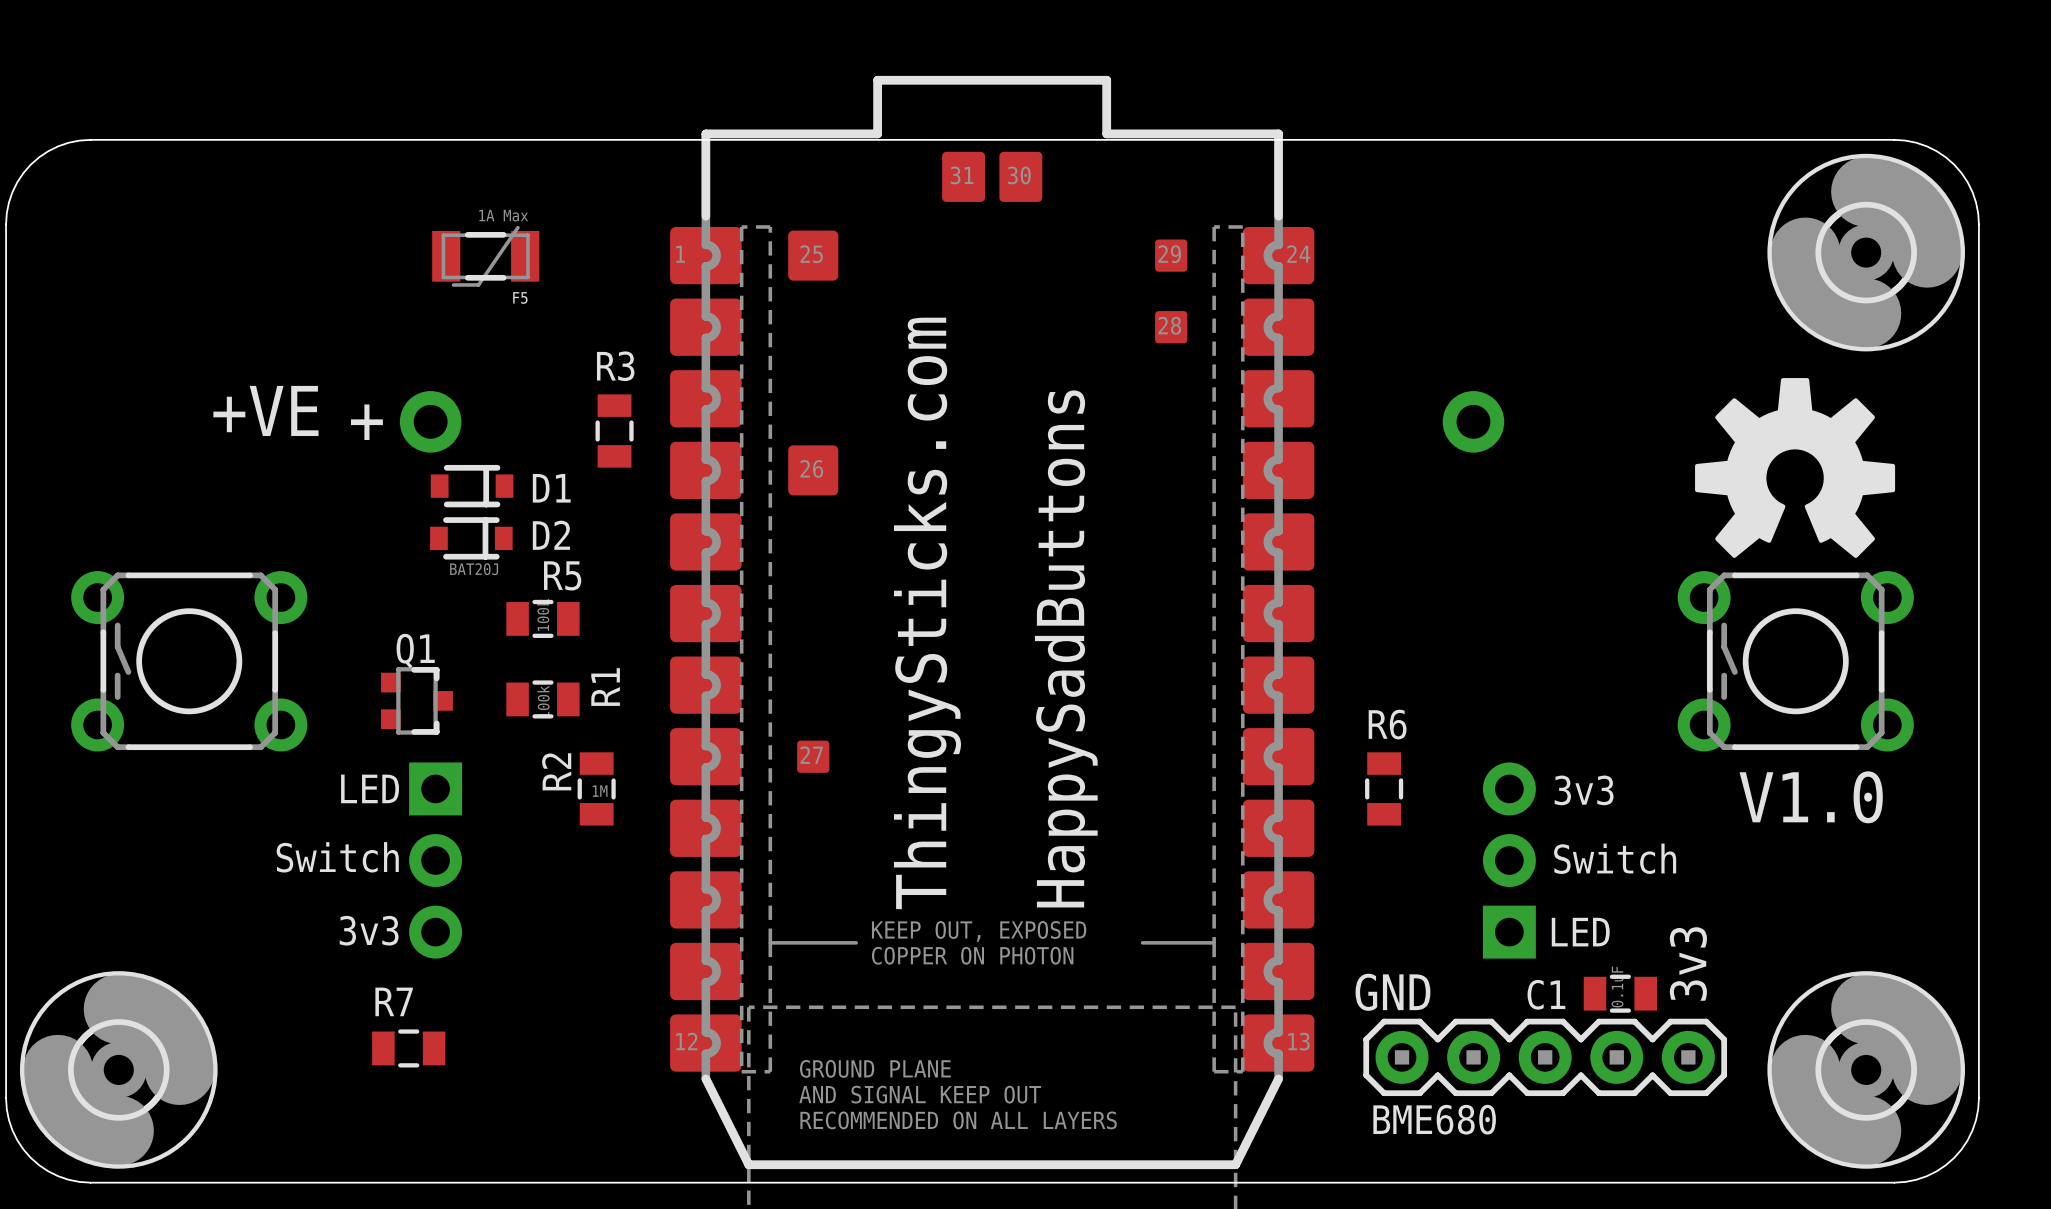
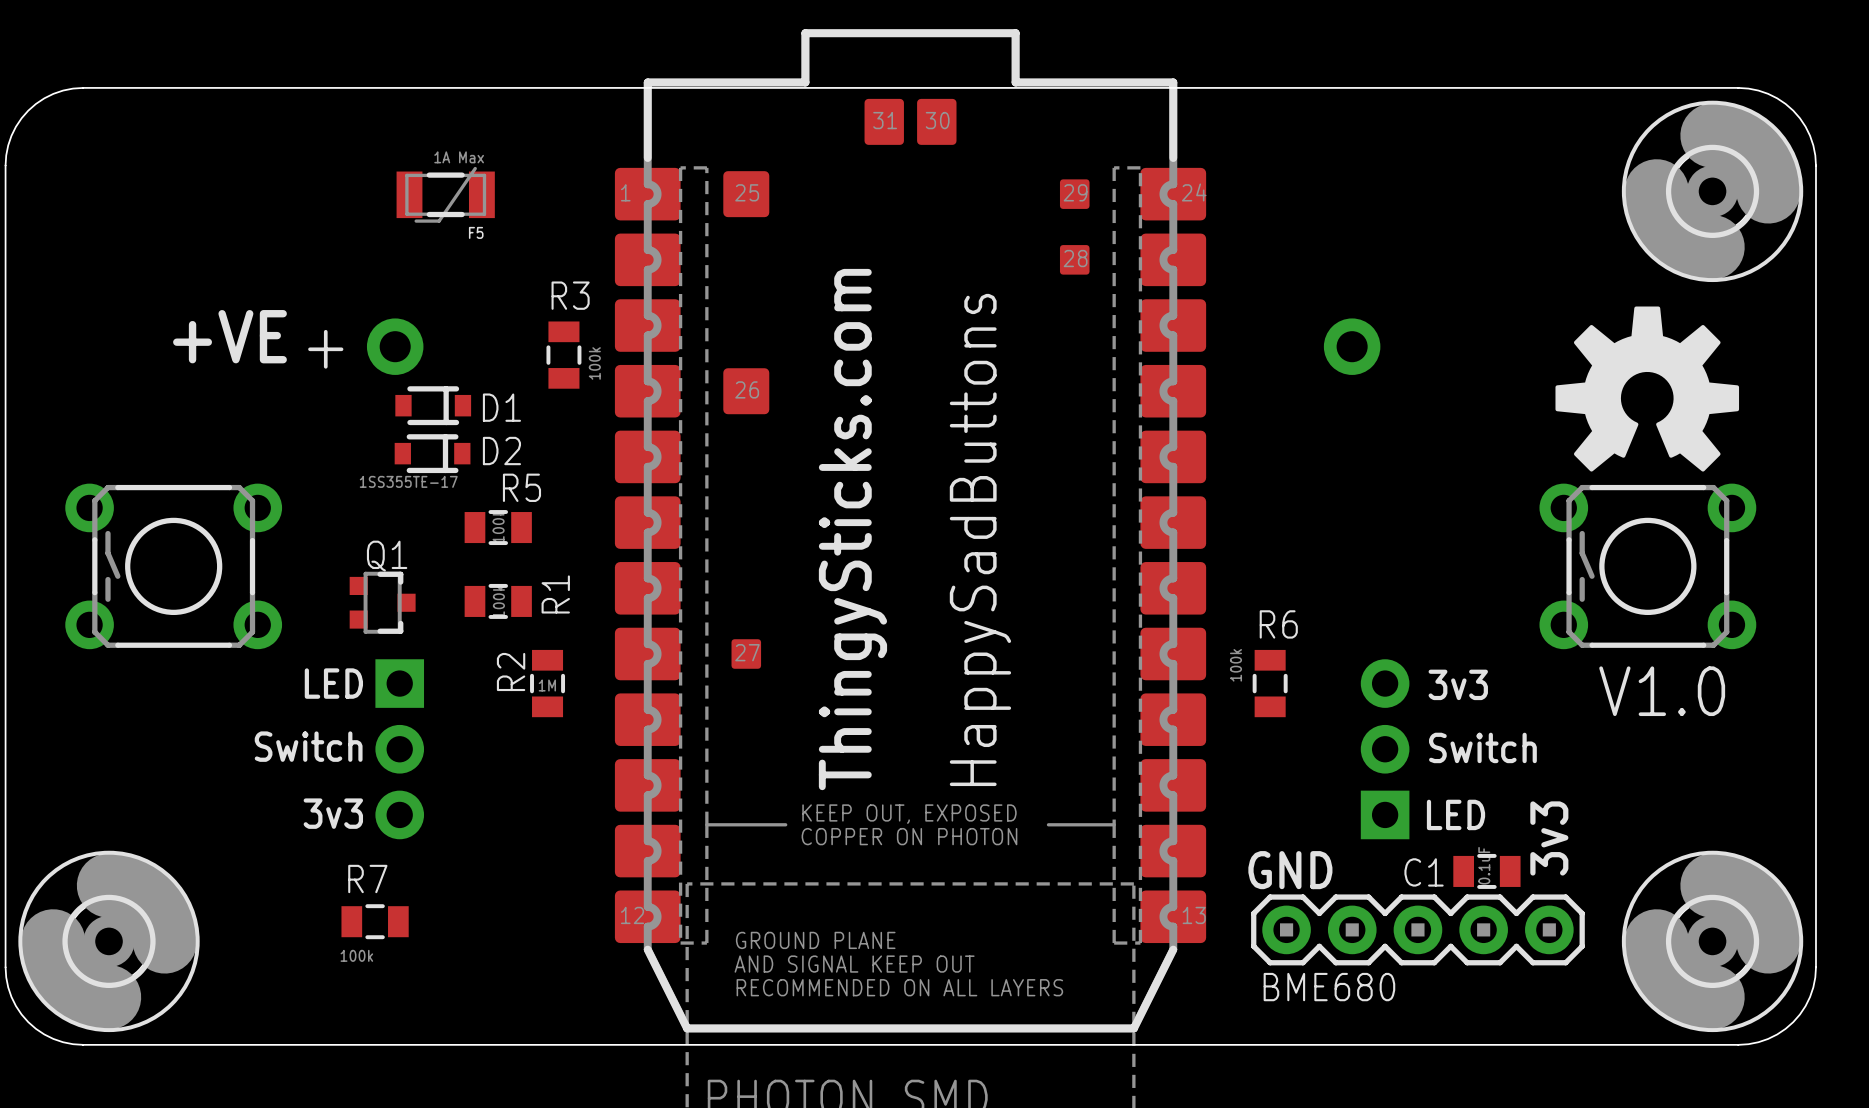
R3 value: none -> 100k (594, 363)
D2 value: BAT20J (474, 569) -> 1SS355TE-17 (408, 481)
R6 value: none -> 100k (1235, 665)
R7 value: none -> 100k (356, 955)

